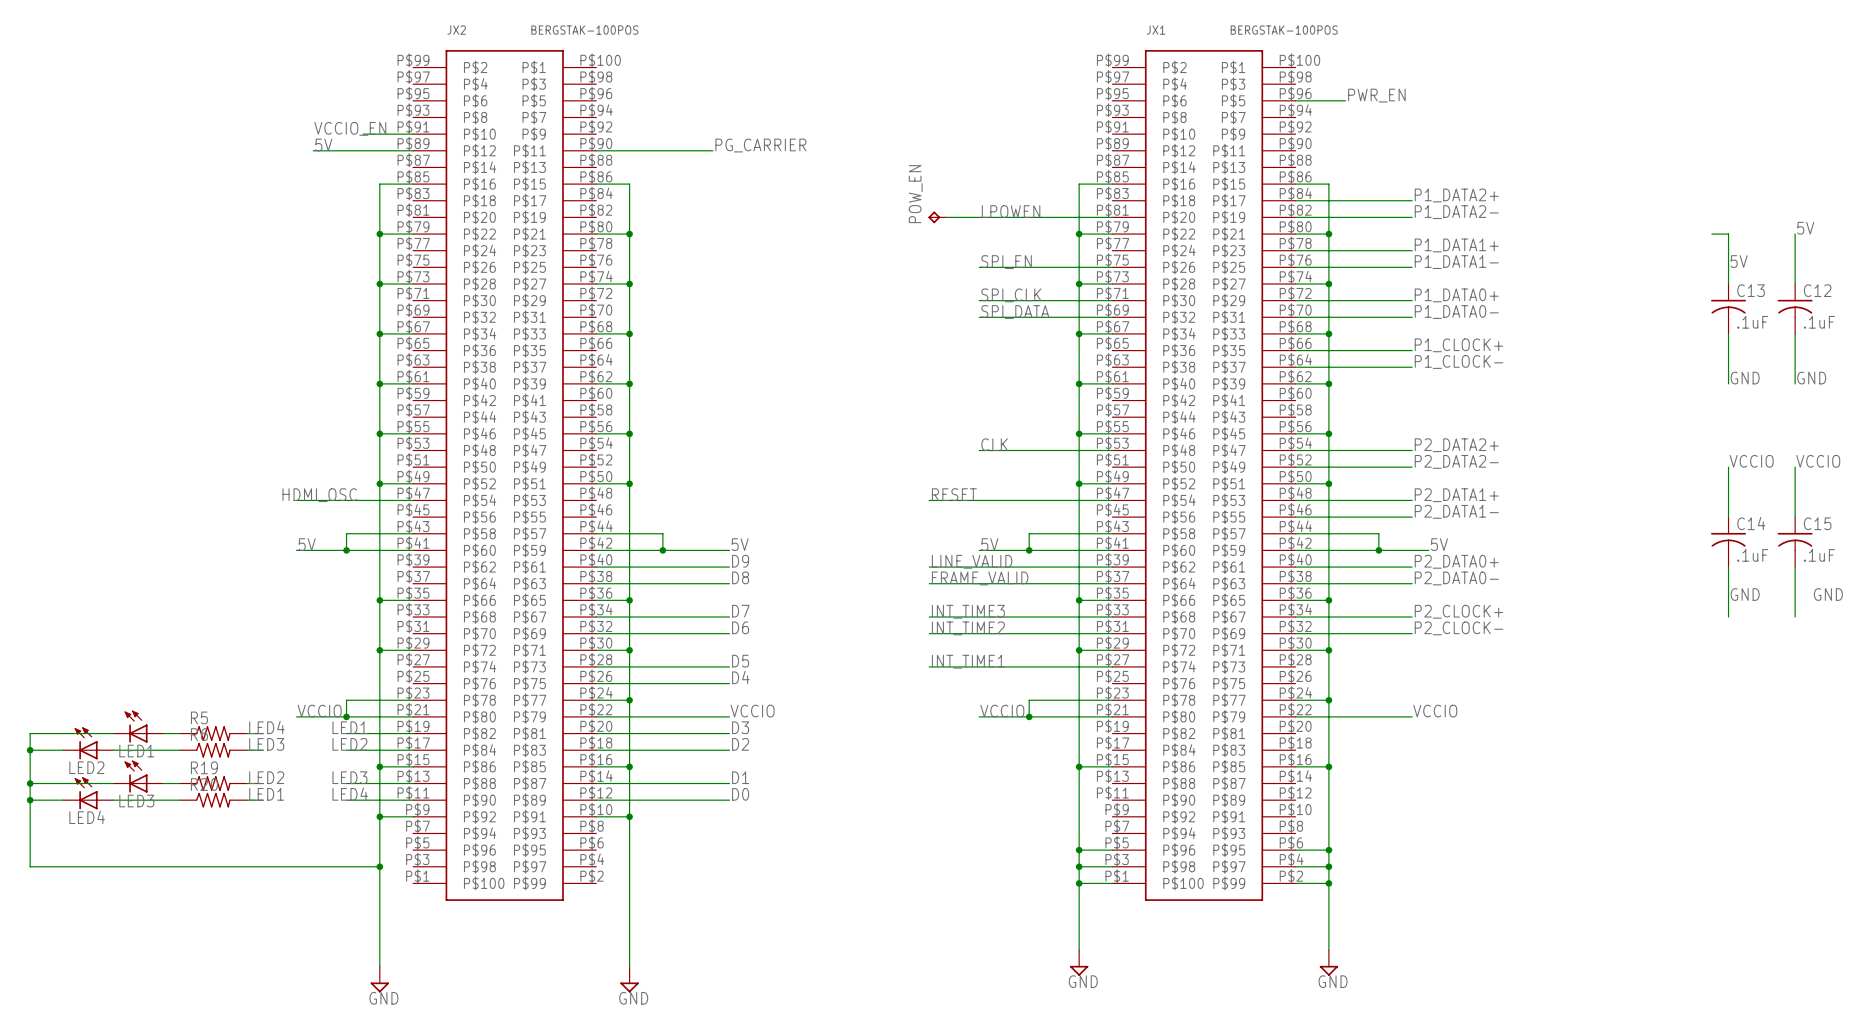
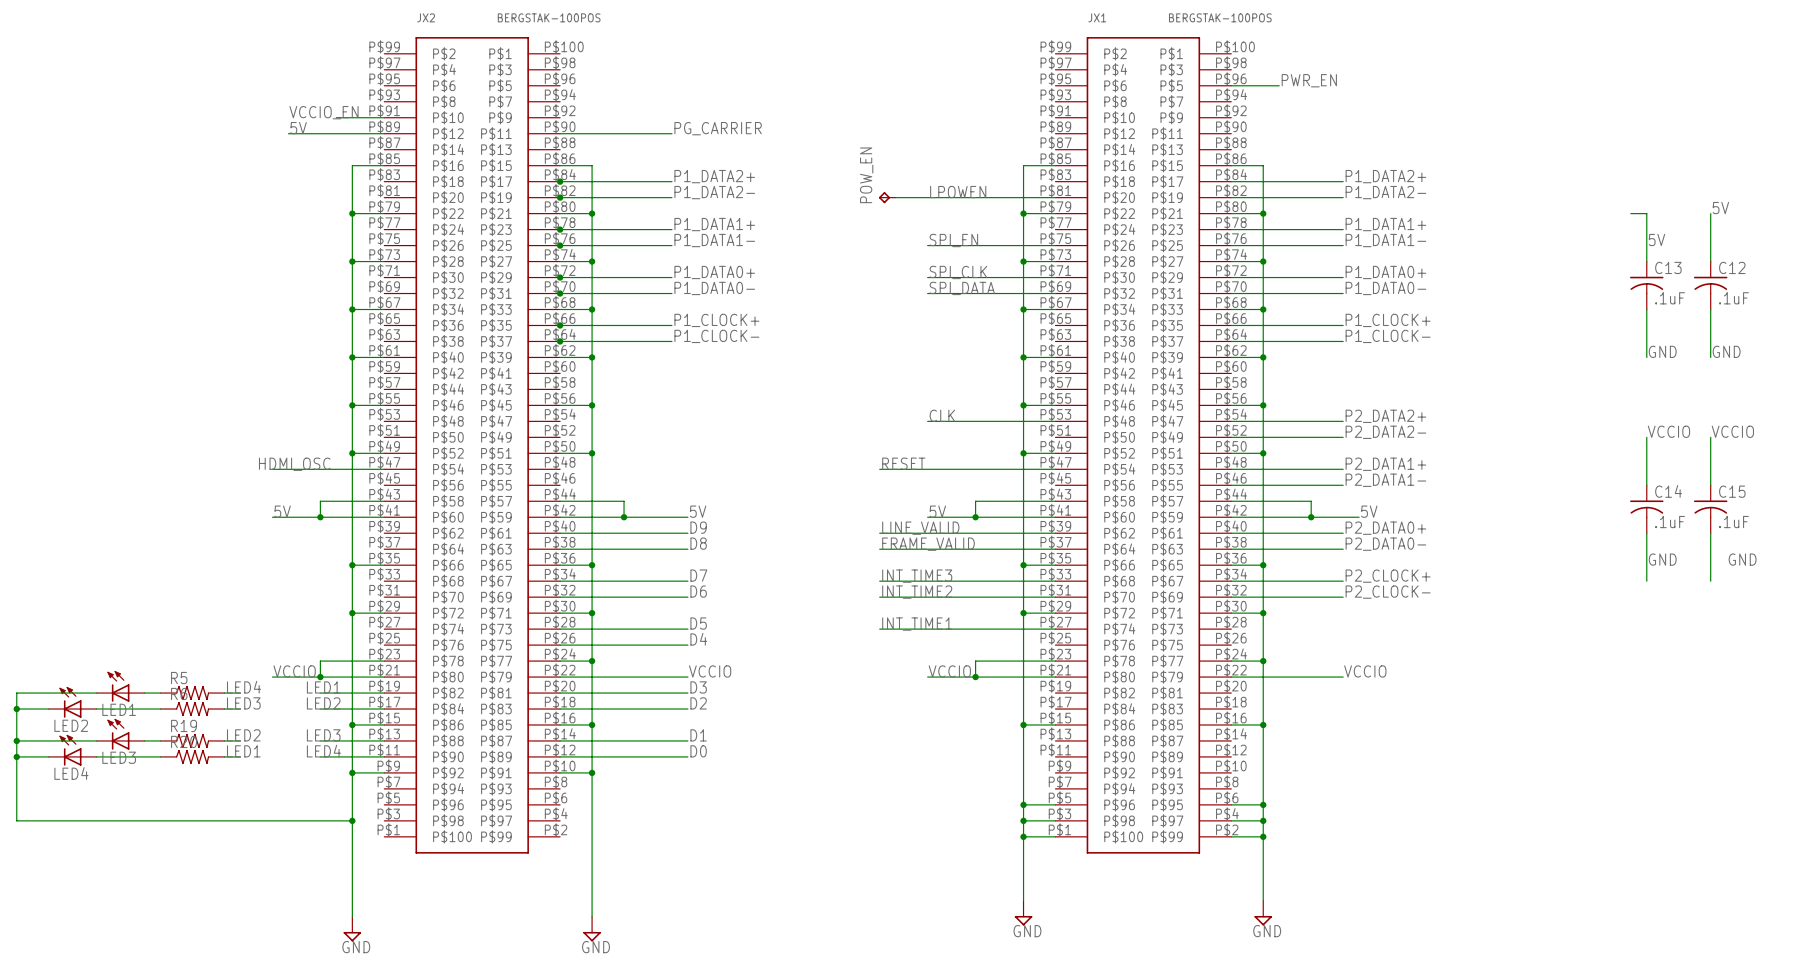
label: none -> P1_DATA2+ (714, 176)
wire: none -> (560, 181) (671, 181)
junction: none -> (560, 181)
label: none -> P1_DATA2- (714, 192)
wire: none -> (560, 197) (671, 197)
junction: none -> (560, 197)
label: none -> P1_DATA1+ (714, 224)
wire: none -> (560, 229) (671, 229)
junction: none -> (560, 229)
label: none -> P1_DATA1- (714, 240)
wire: none -> (560, 245) (671, 245)
junction: none -> (560, 245)
label: none -> P1_DATA0+ (714, 272)
wire: none -> (560, 277) (671, 277)
junction: none -> (560, 277)
label: none -> P1_DATA0- (714, 288)
wire: none -> (560, 293) (671, 293)
junction: none -> (560, 293)
label: none -> P1_CLOCK+ (716, 320)
wire: none -> (560, 325) (671, 325)
junction: none -> (560, 325)
label: none -> P1_CLOCK- (716, 336)
wire: none -> (560, 341) (671, 341)
junction: none -> (560, 341)

